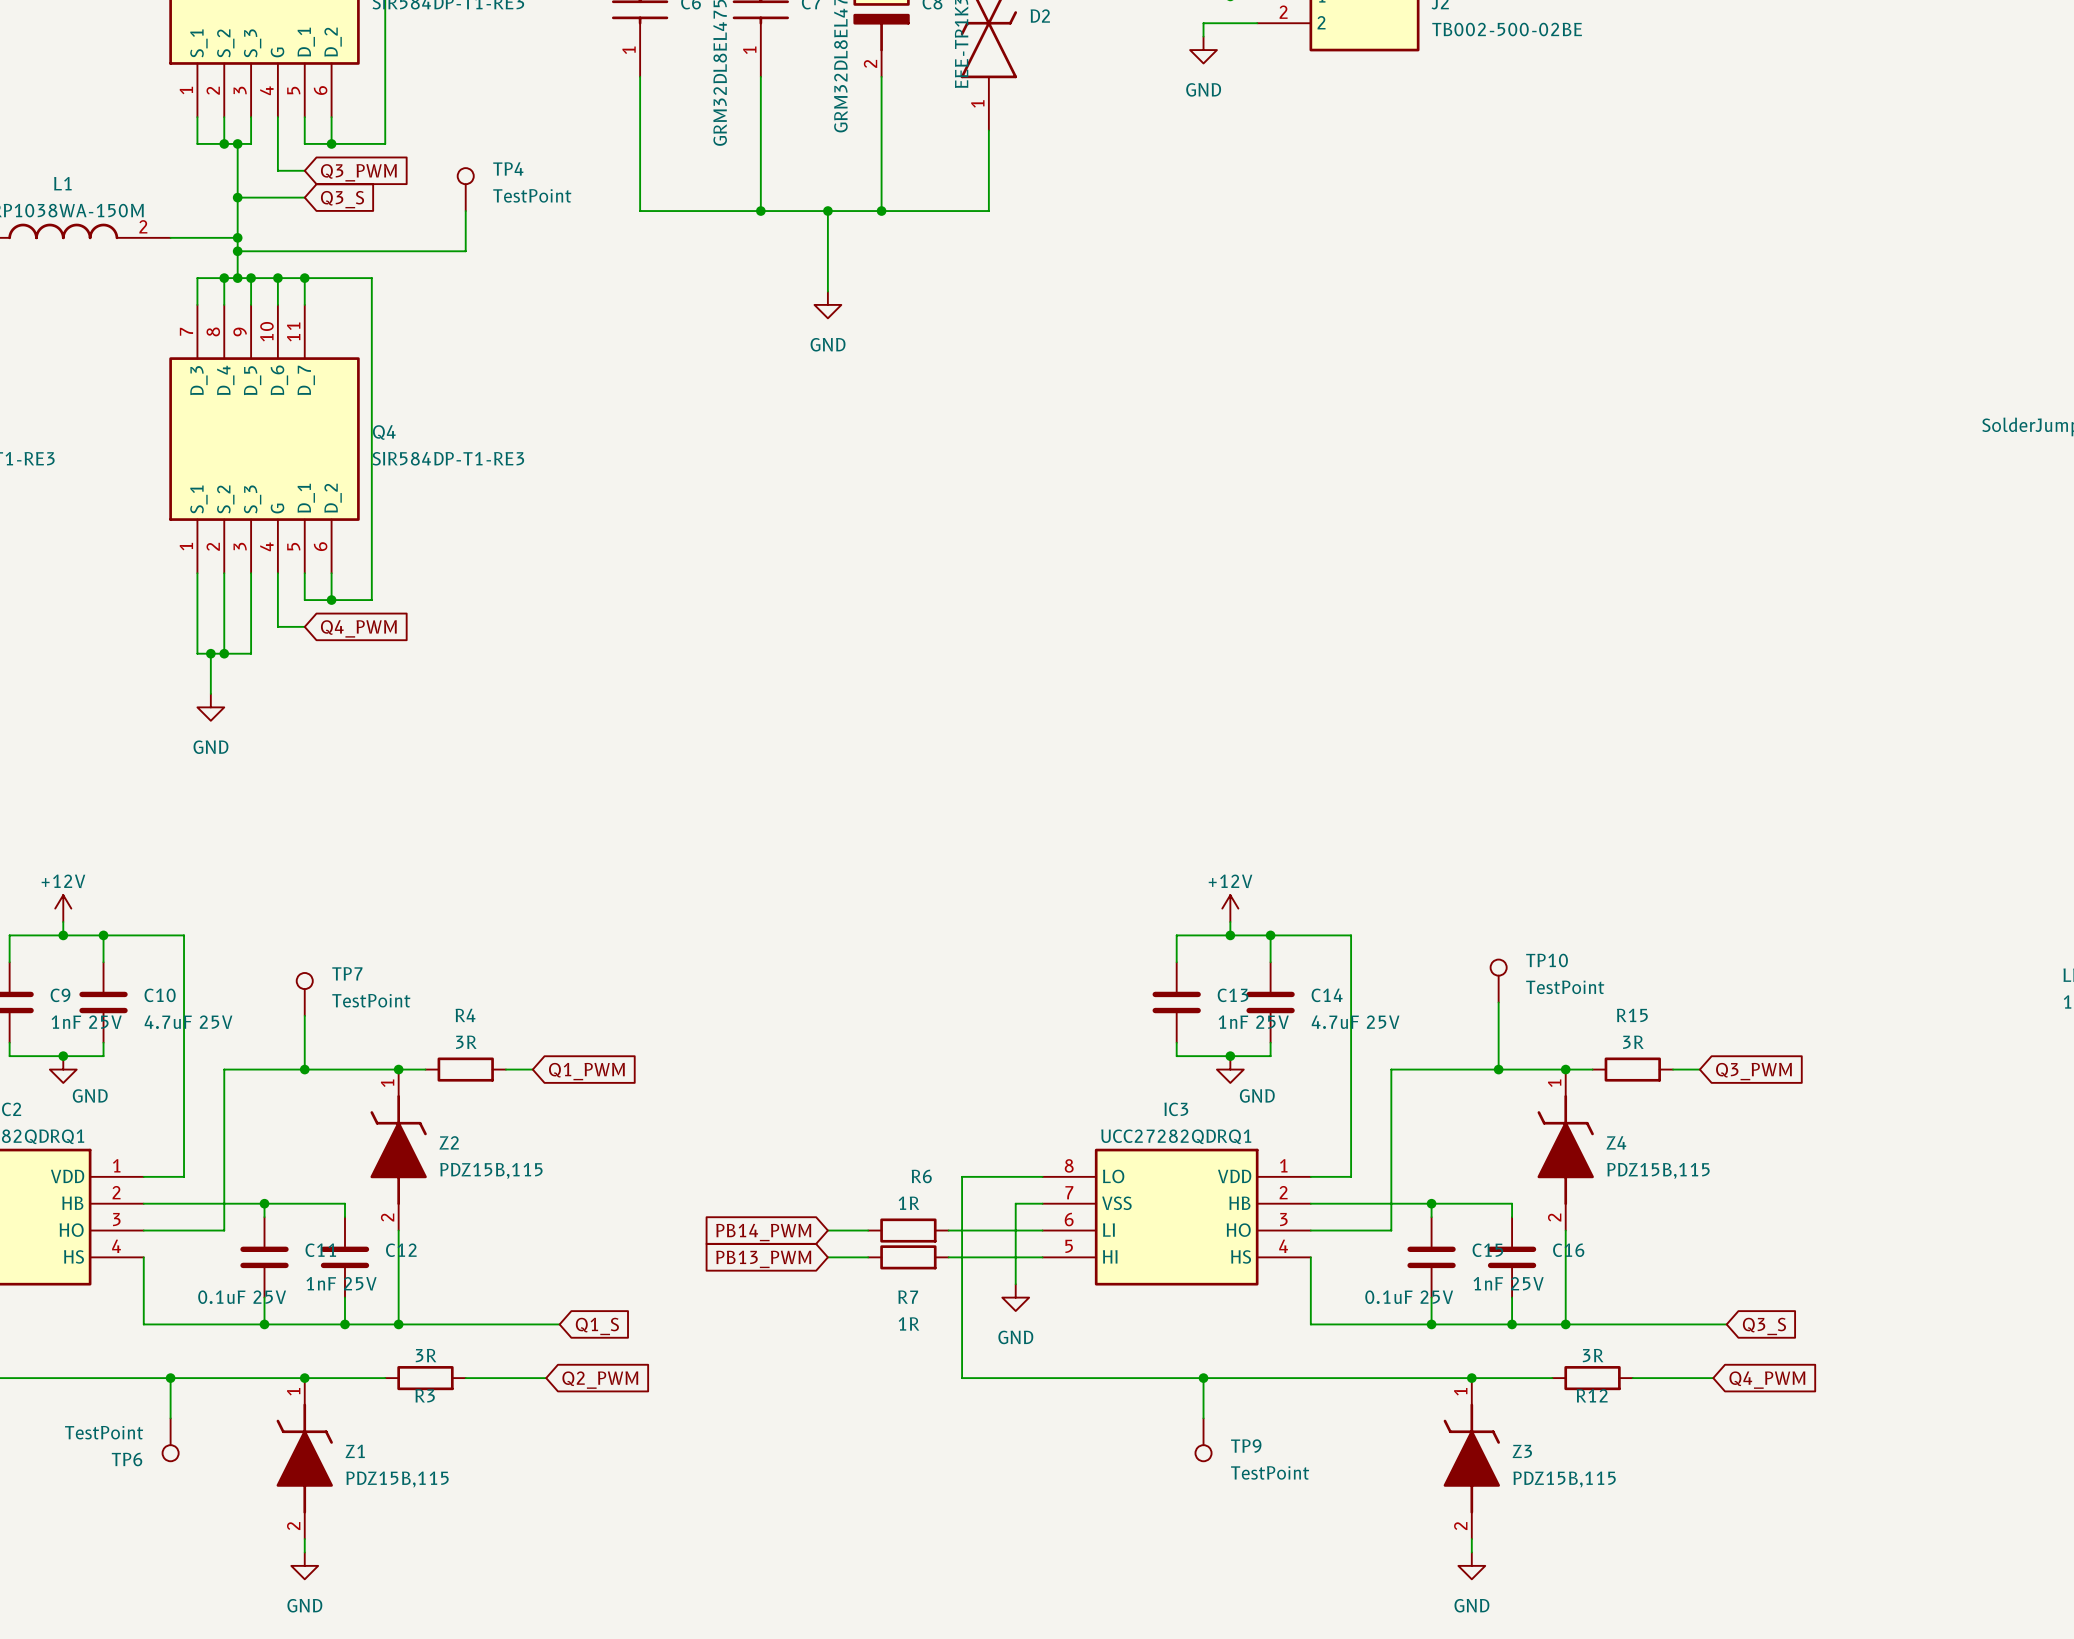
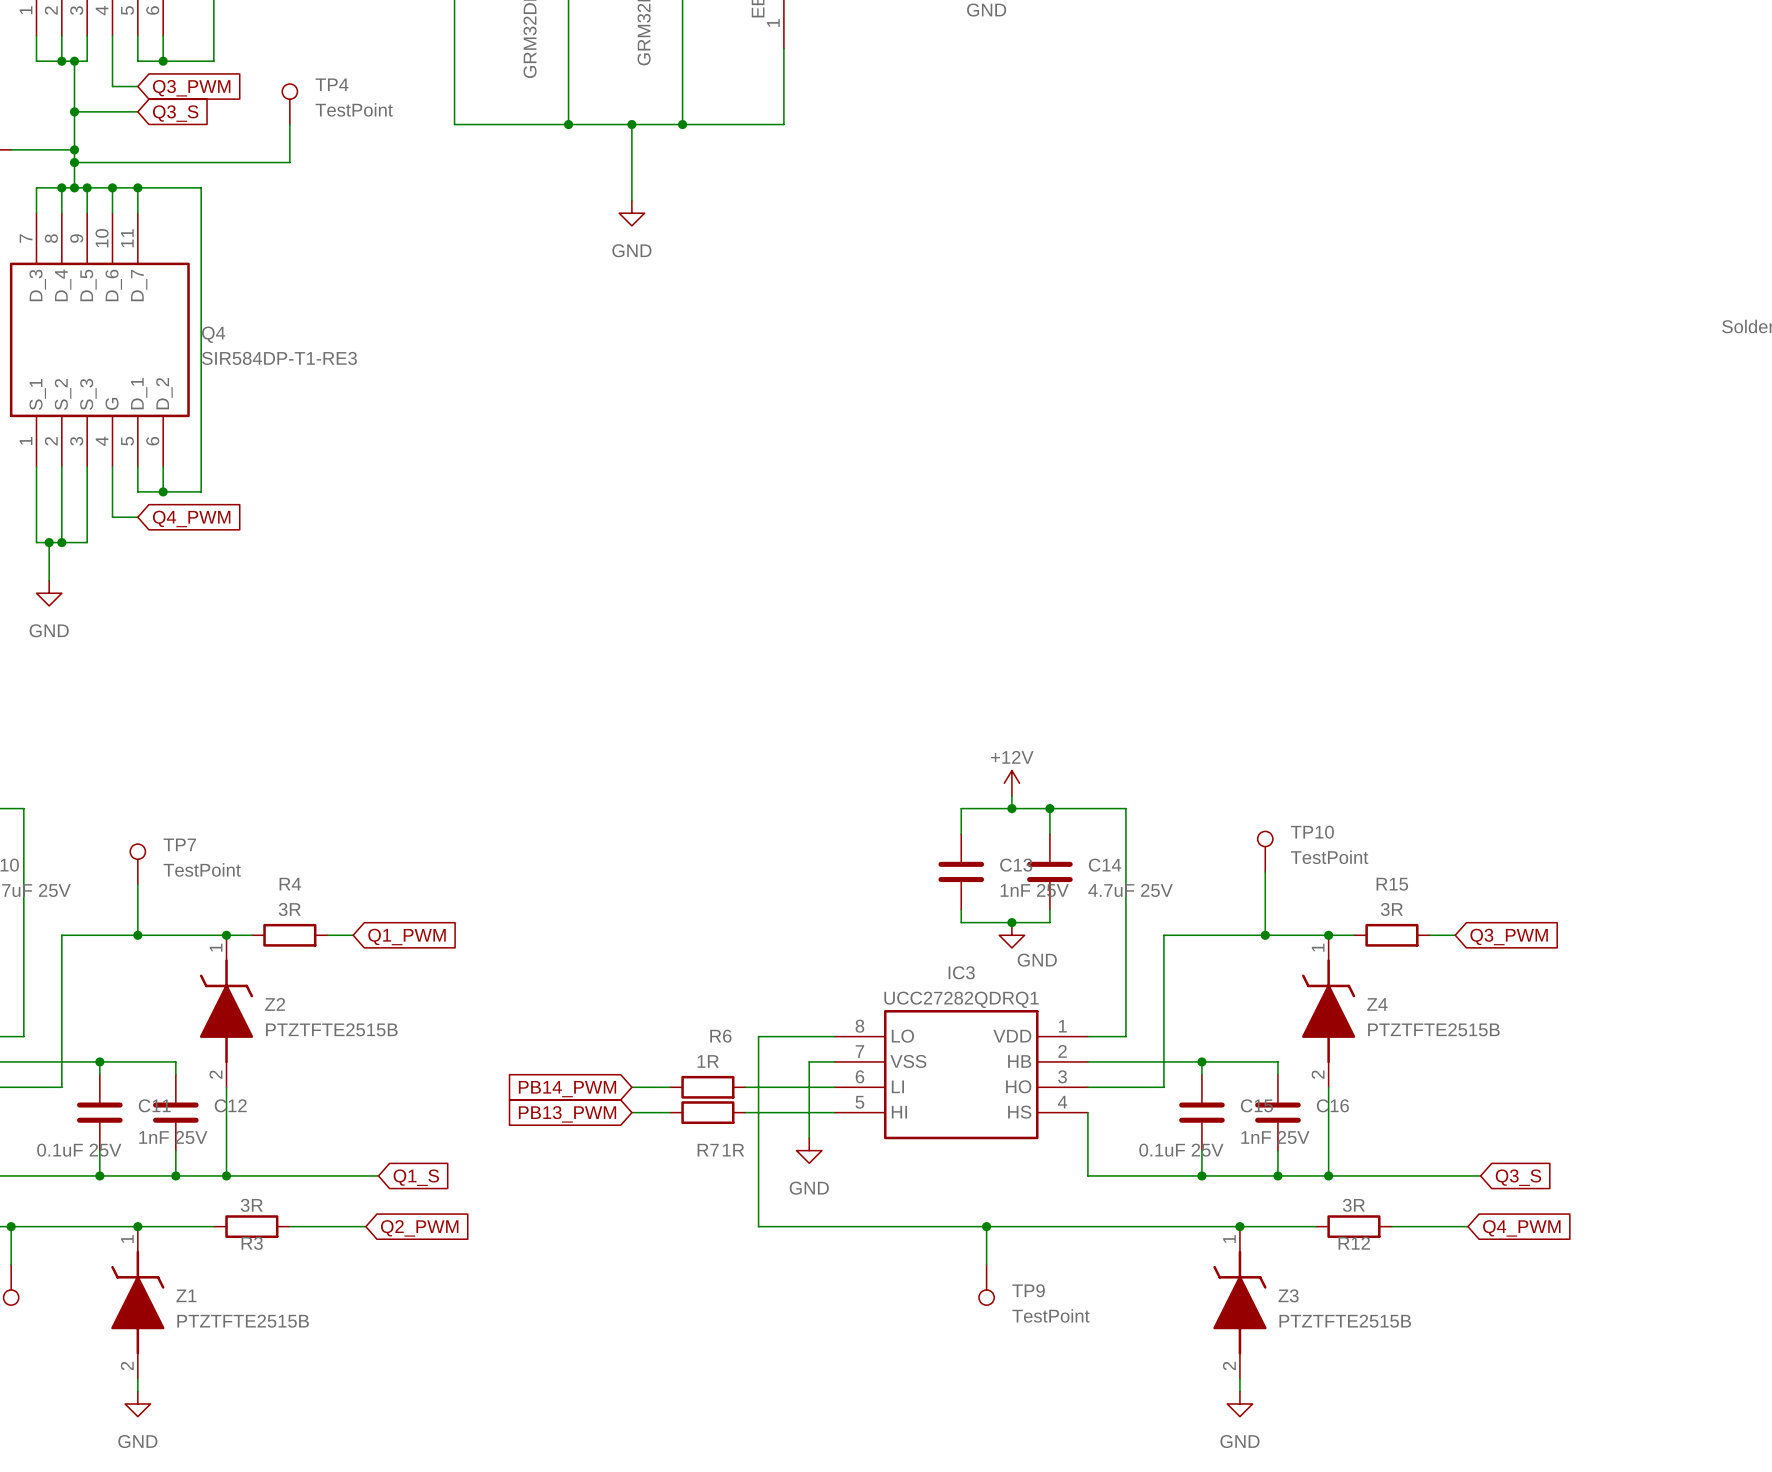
Z2 value: PDZ15B,115 (491, 1170) -> PTZTFTE2515B (331, 1029)
Z4 value: PDZ15B,115 (1658, 1170) -> PTZTFTE2515B (1433, 1029)
R7 value position: 1R (908, 1323) -> 1R (733, 1150)
Z1 value: PDZ15B,115 (397, 1479) -> PTZTFTE2515B (243, 1321)
Z3 value: PDZ15B,115 (1564, 1479) -> PTZTFTE2515B (1345, 1321)

